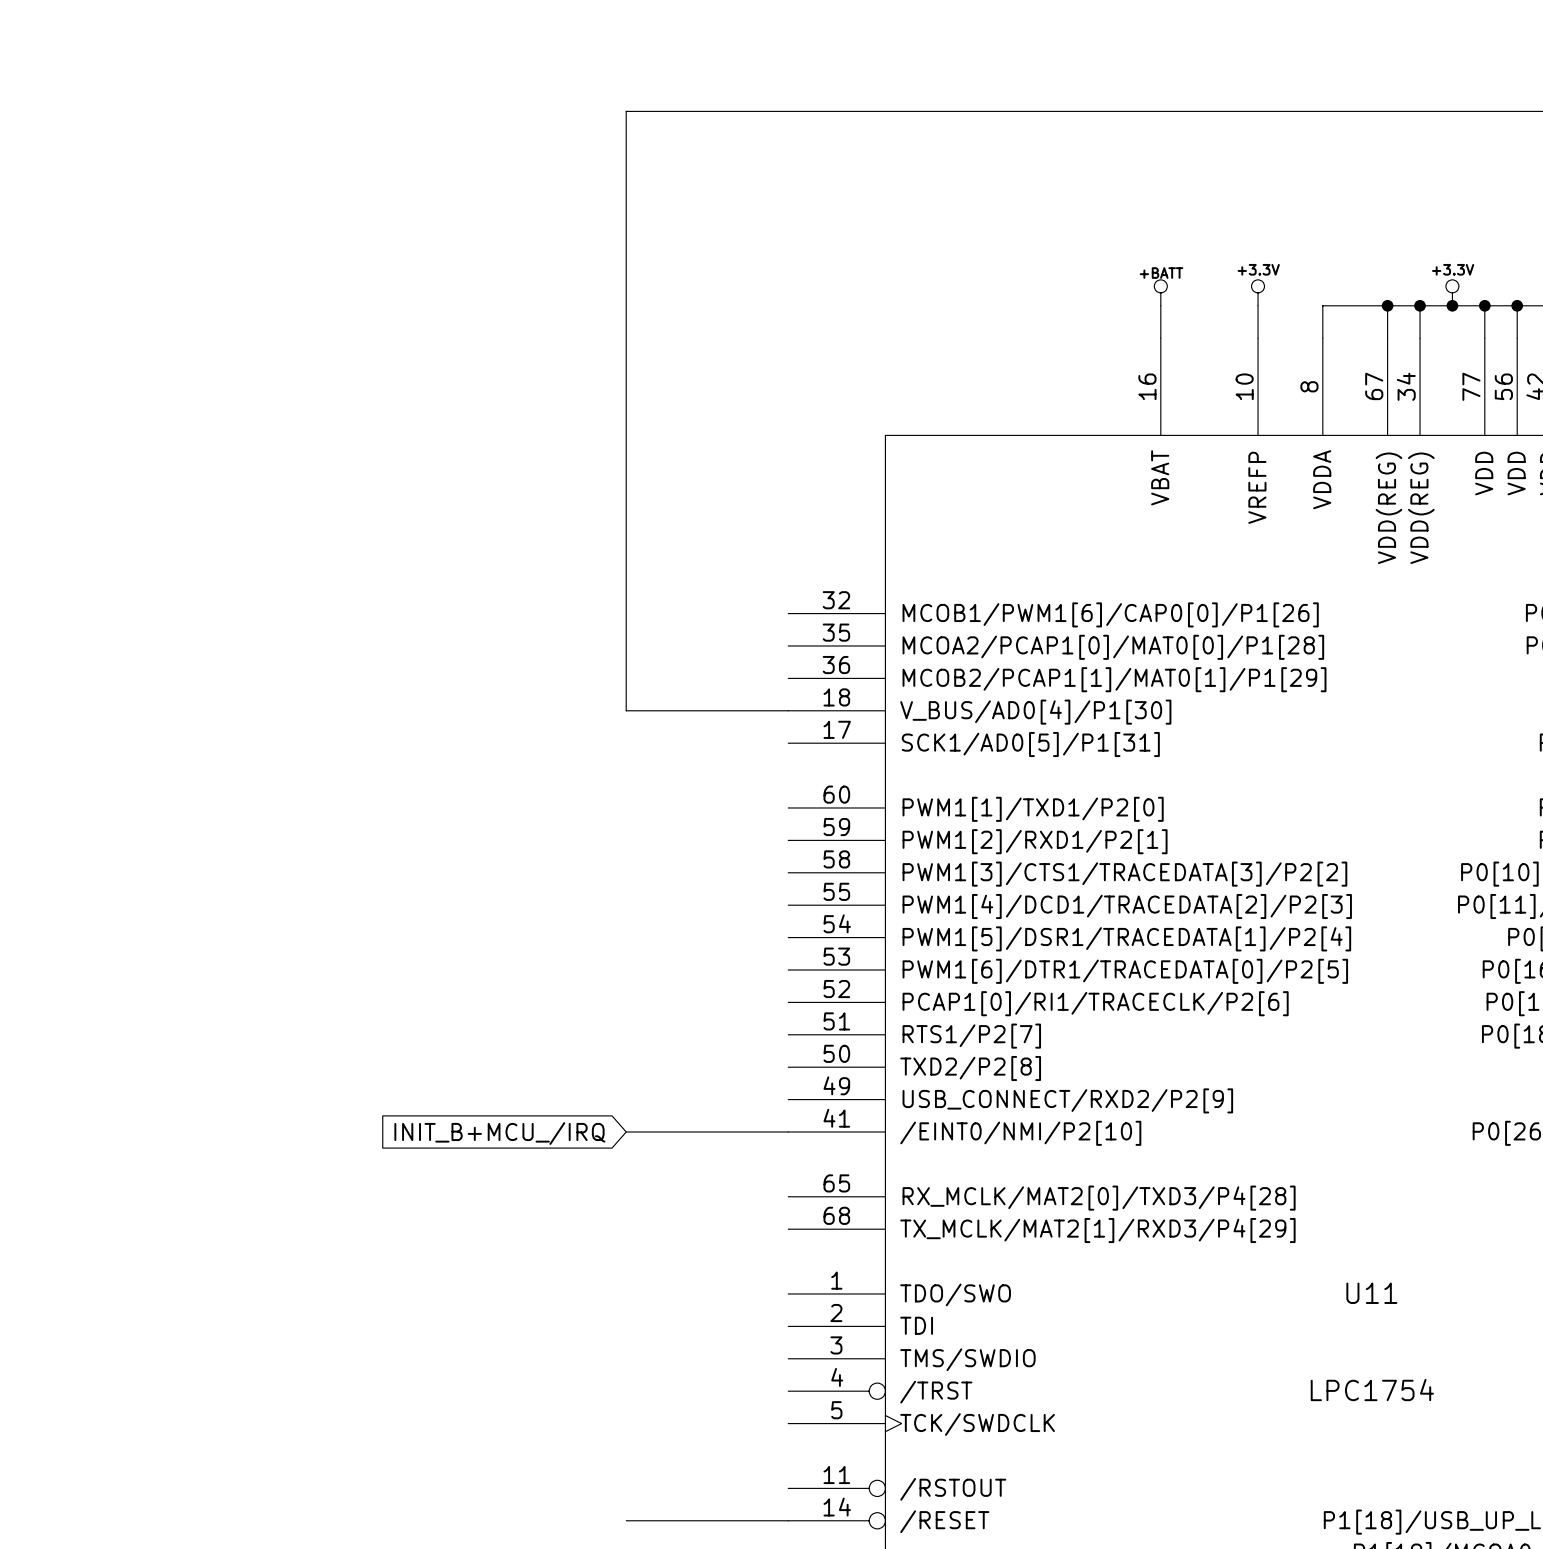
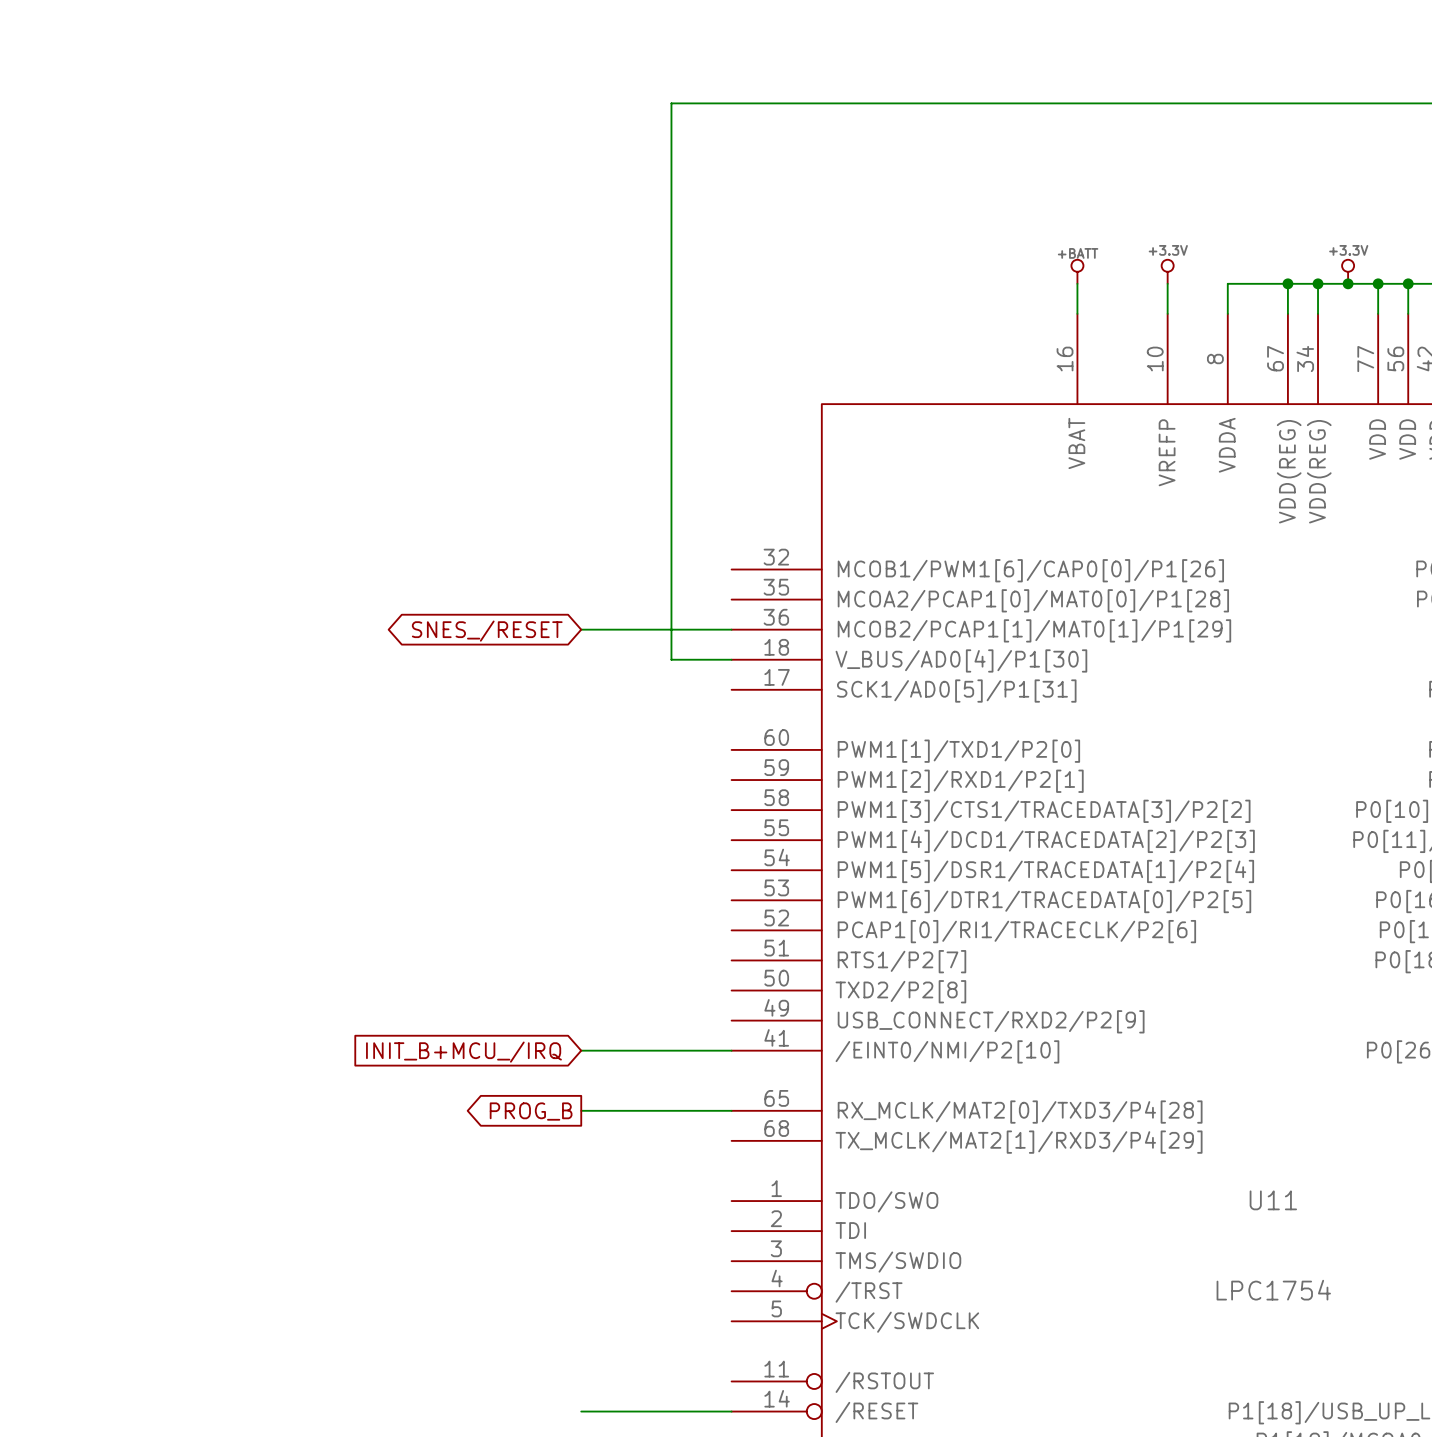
wire: (723, 111) (626, 111) (626, 710) (723, 710) -> (671, 103) (671, 659)
wire: none -> (581, 629) (731, 629)
global label: none -> SNES_/RESET (487, 631)
wire: none -> (581, 1110) (731, 1110)
global label: none -> PROG_B (531, 1111)

